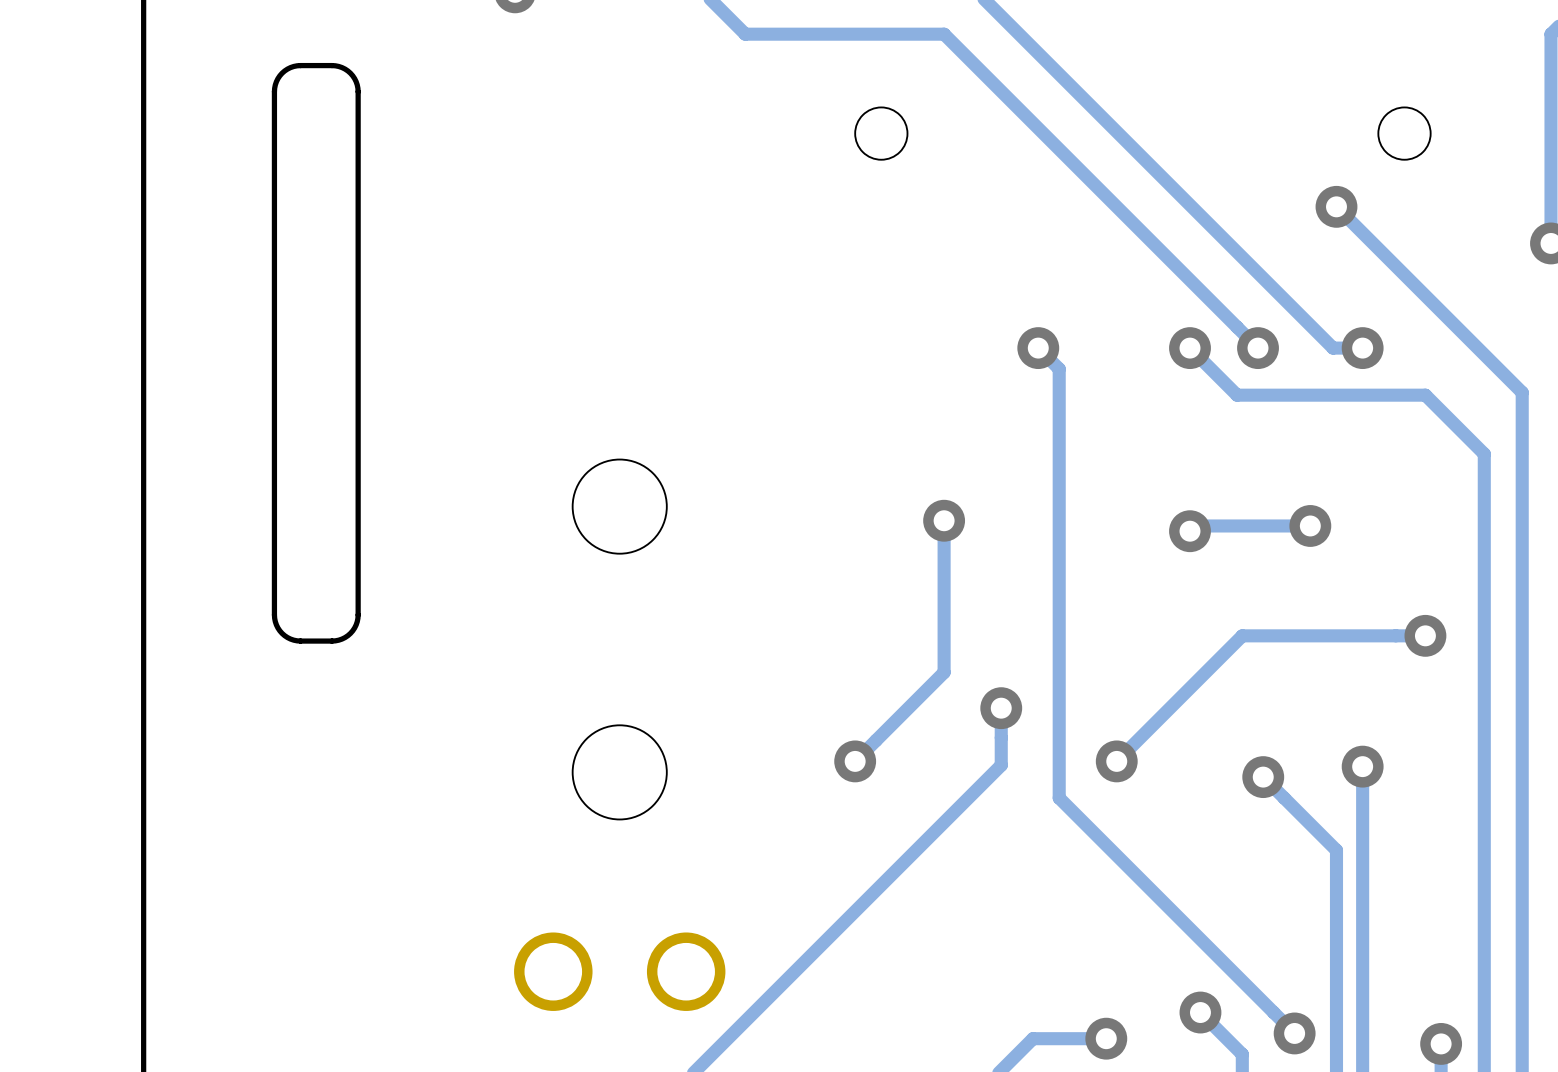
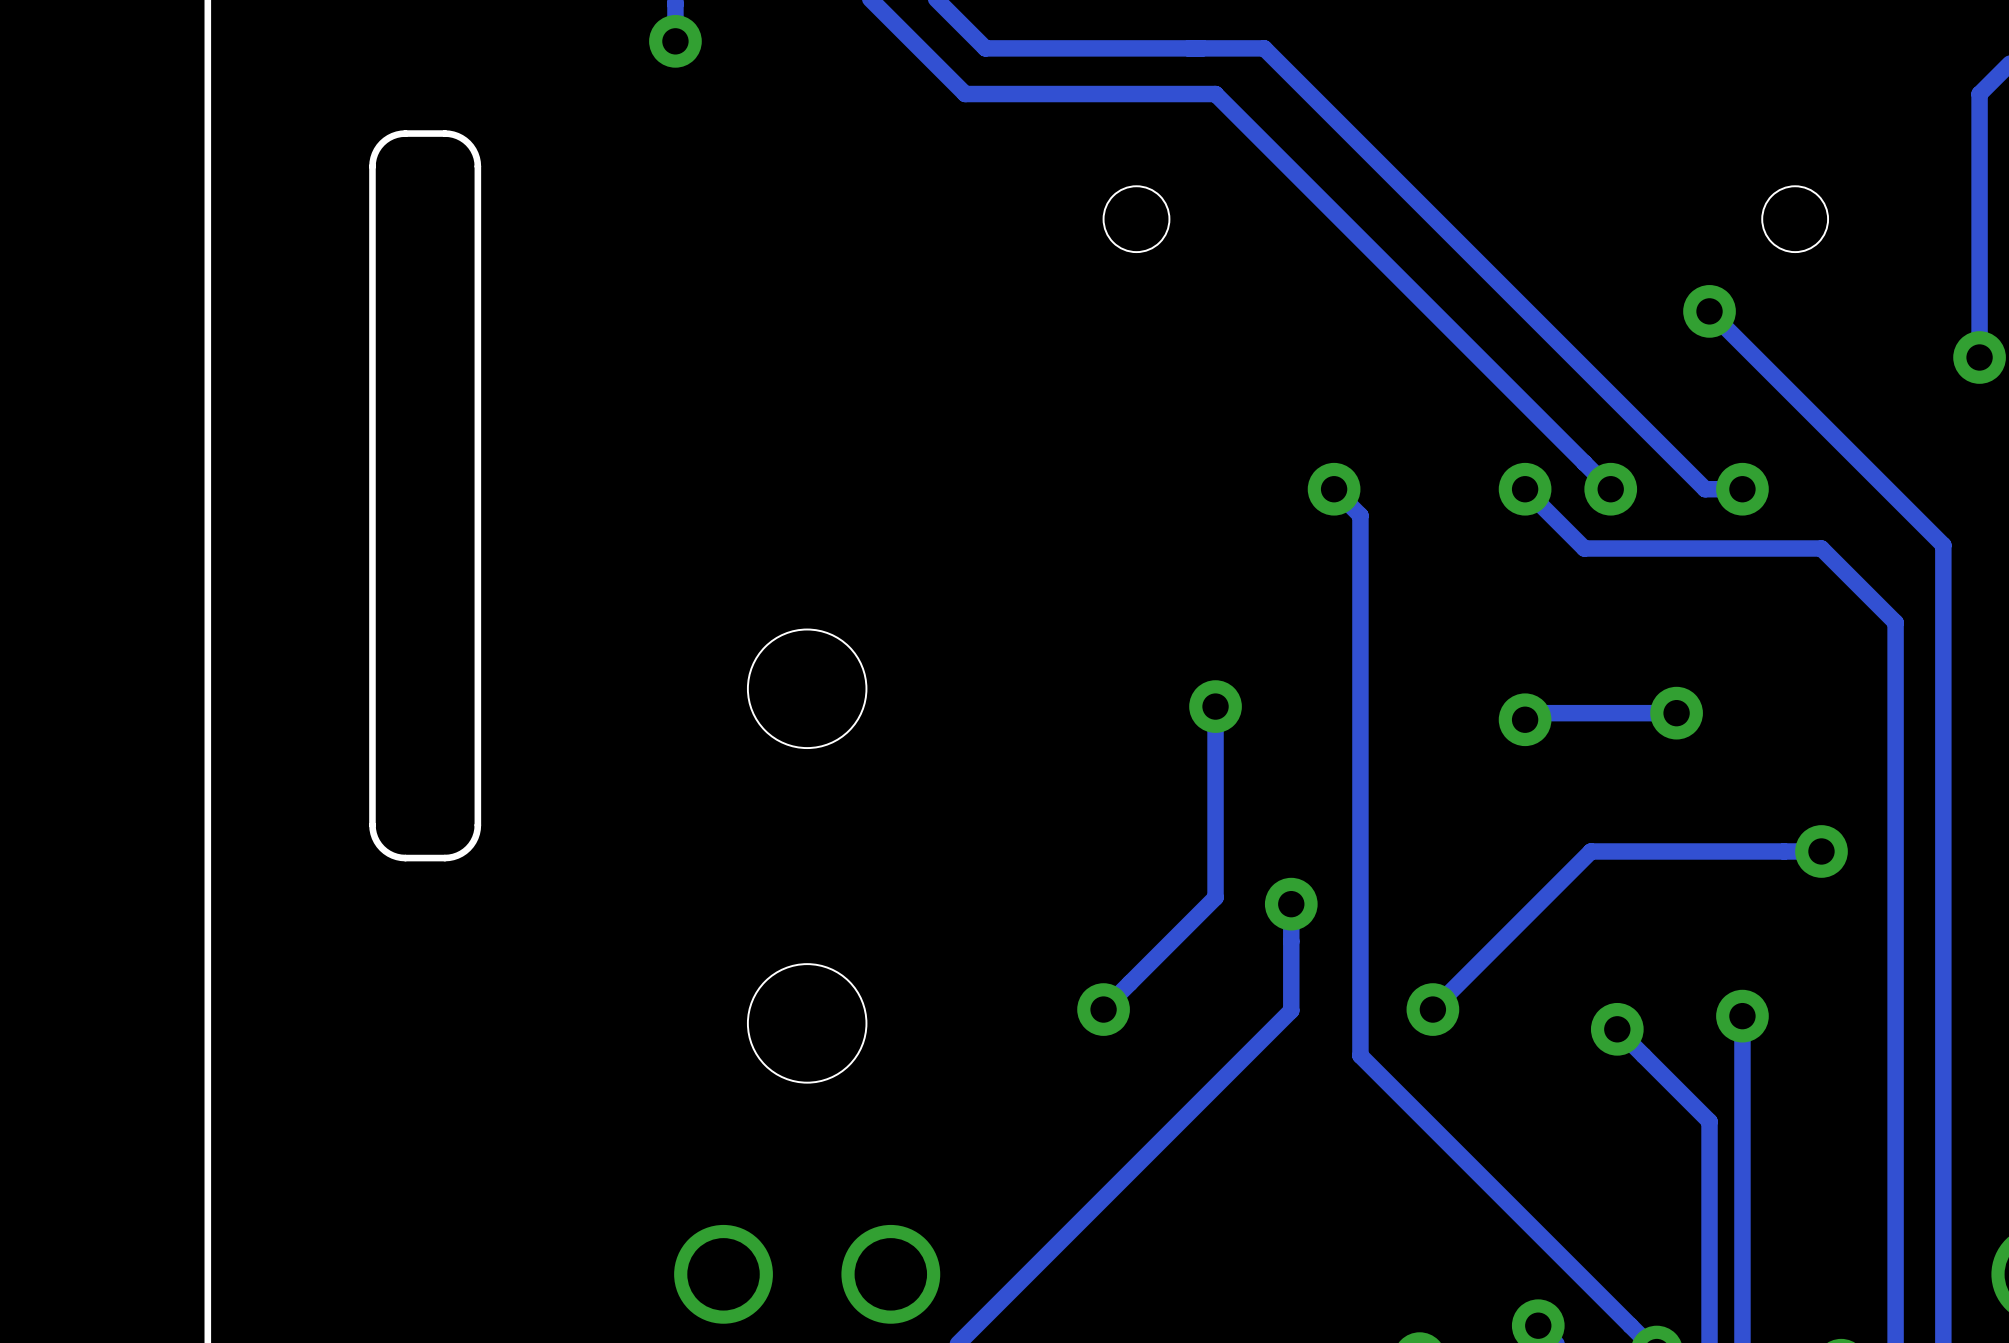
track: (1001, 708) (1001, 765) -> (1291, 904) (1291, 1010) (1287, 1014)
via position: (1001, 708) -> (1291, 904)

